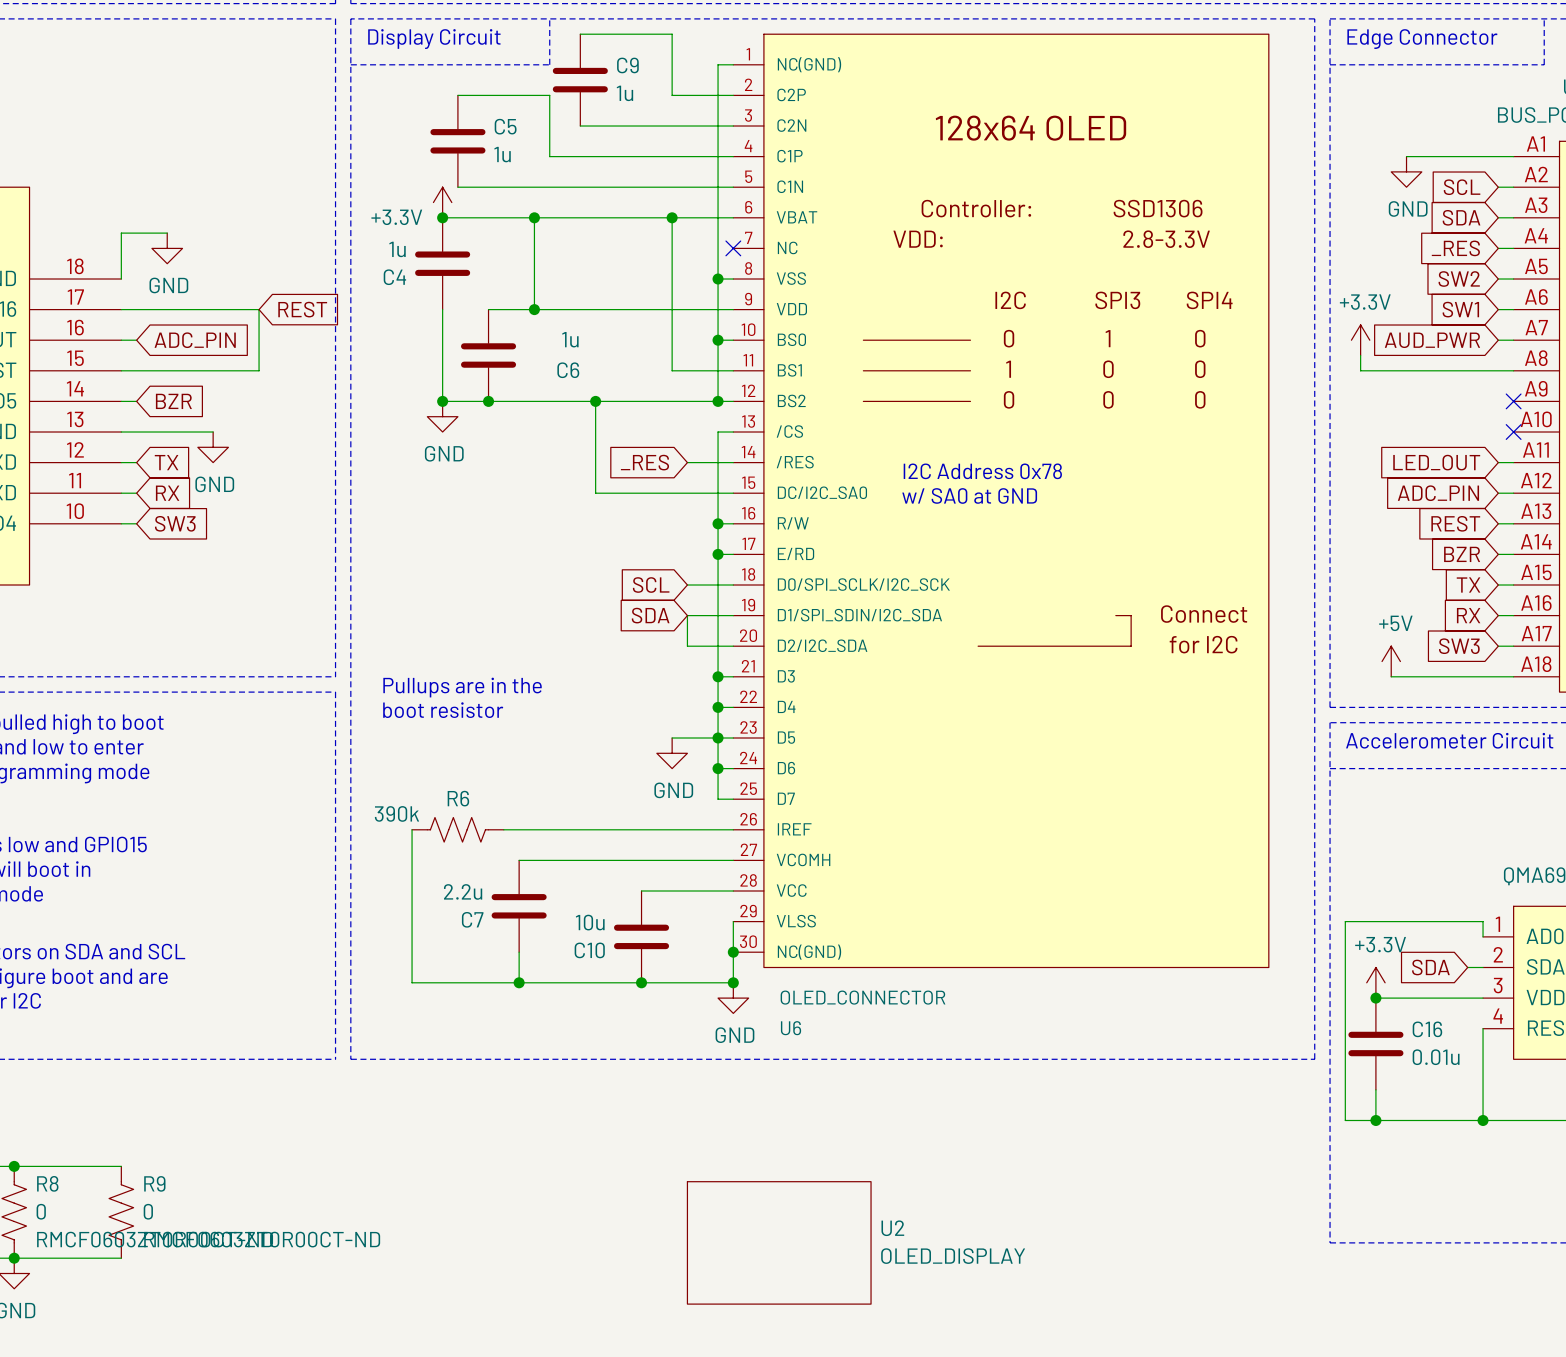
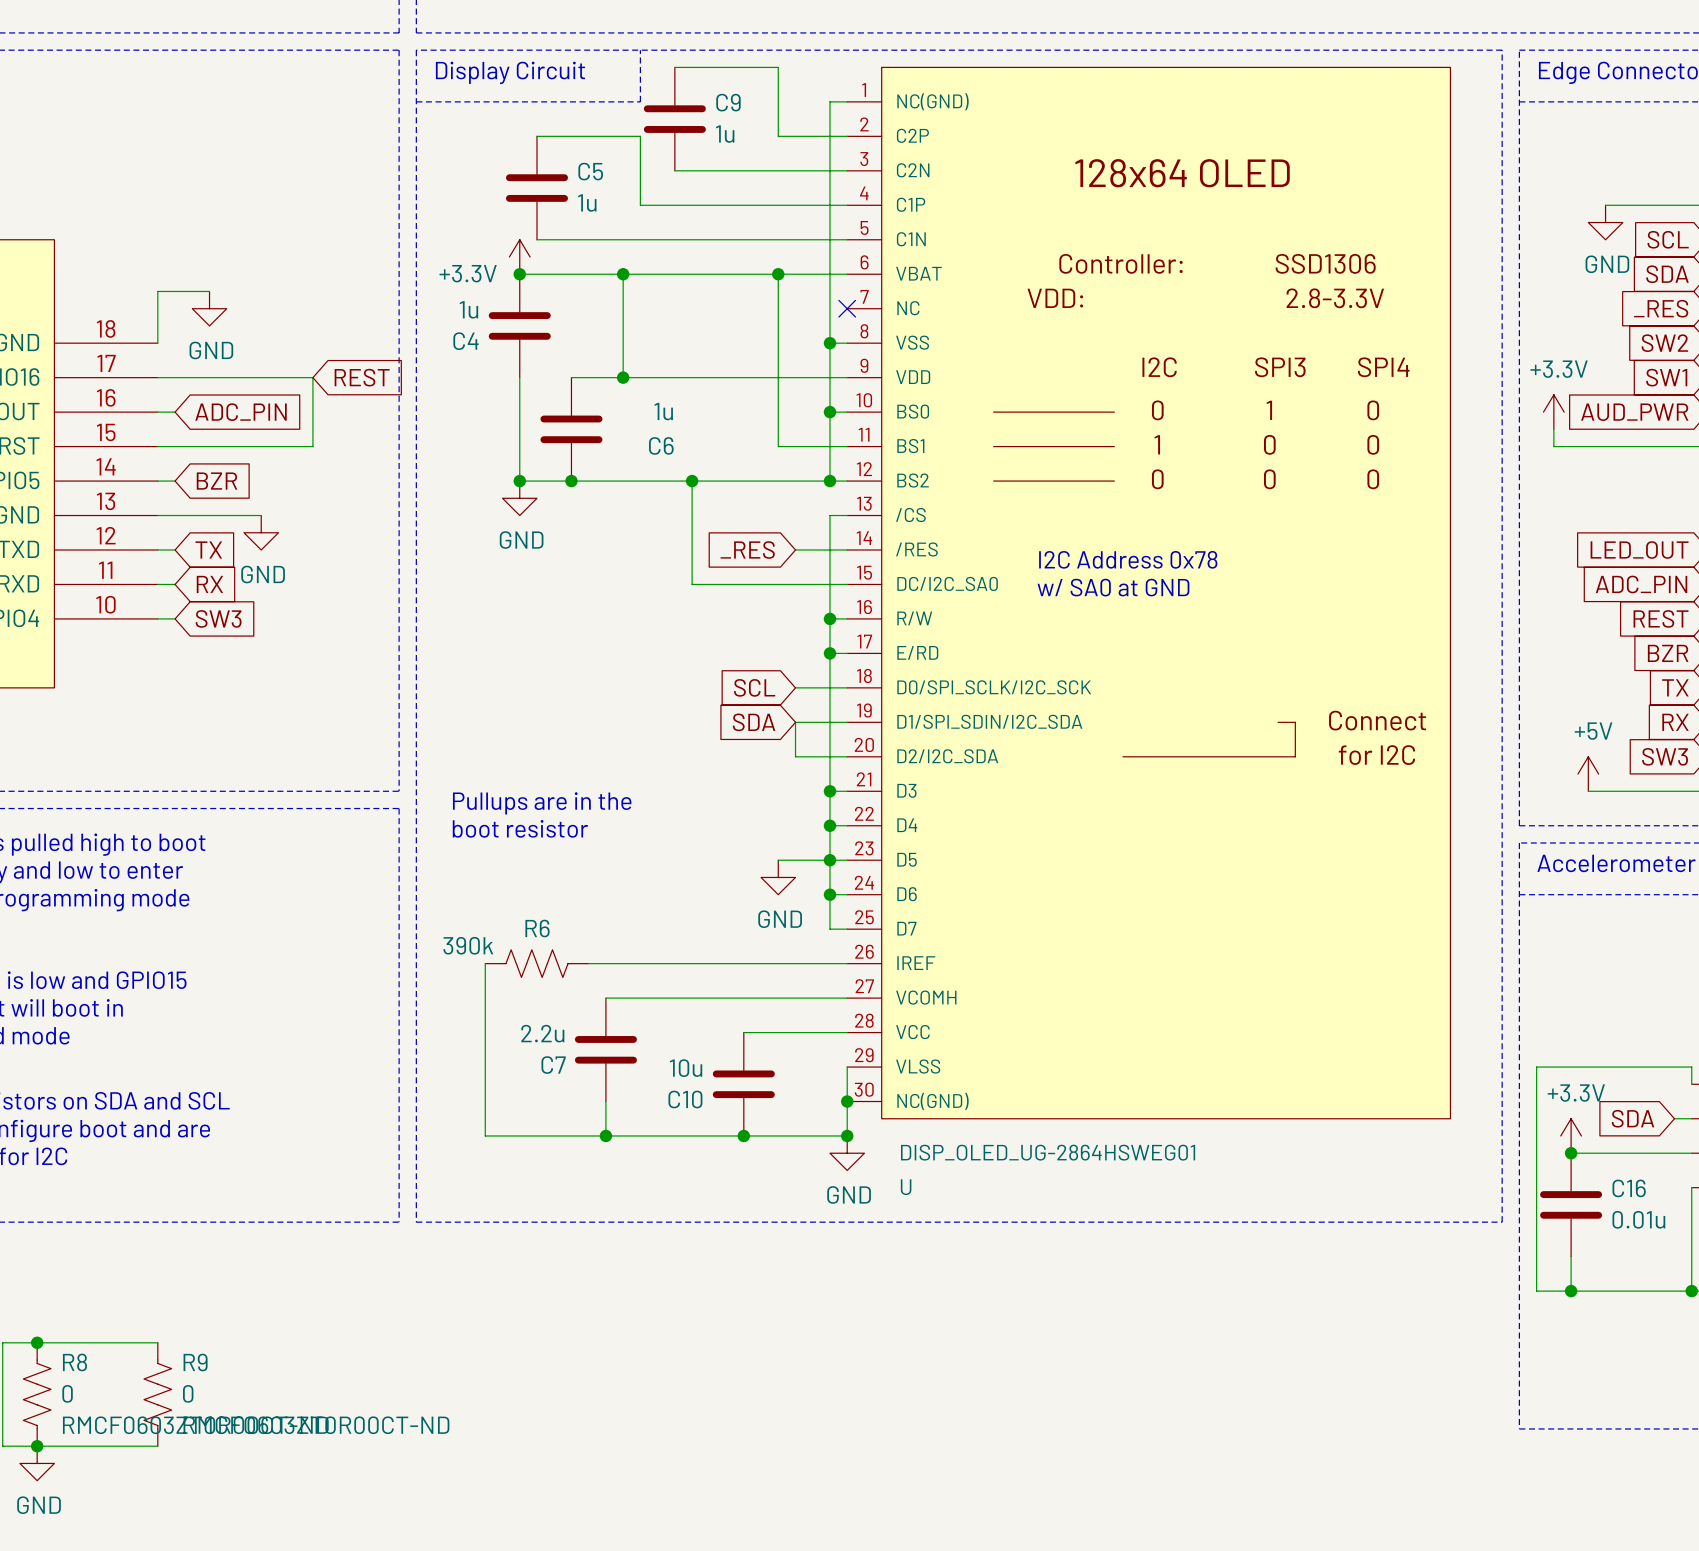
U6 value: OLED_CONNECTOR (862, 997) -> DISP_OLED_UG-2864HSWEG01 (1048, 1152)
U6 name: U6 (791, 1028) -> U (906, 1187)
U2: OLED_DISPLAY (779, 1242) -> none

